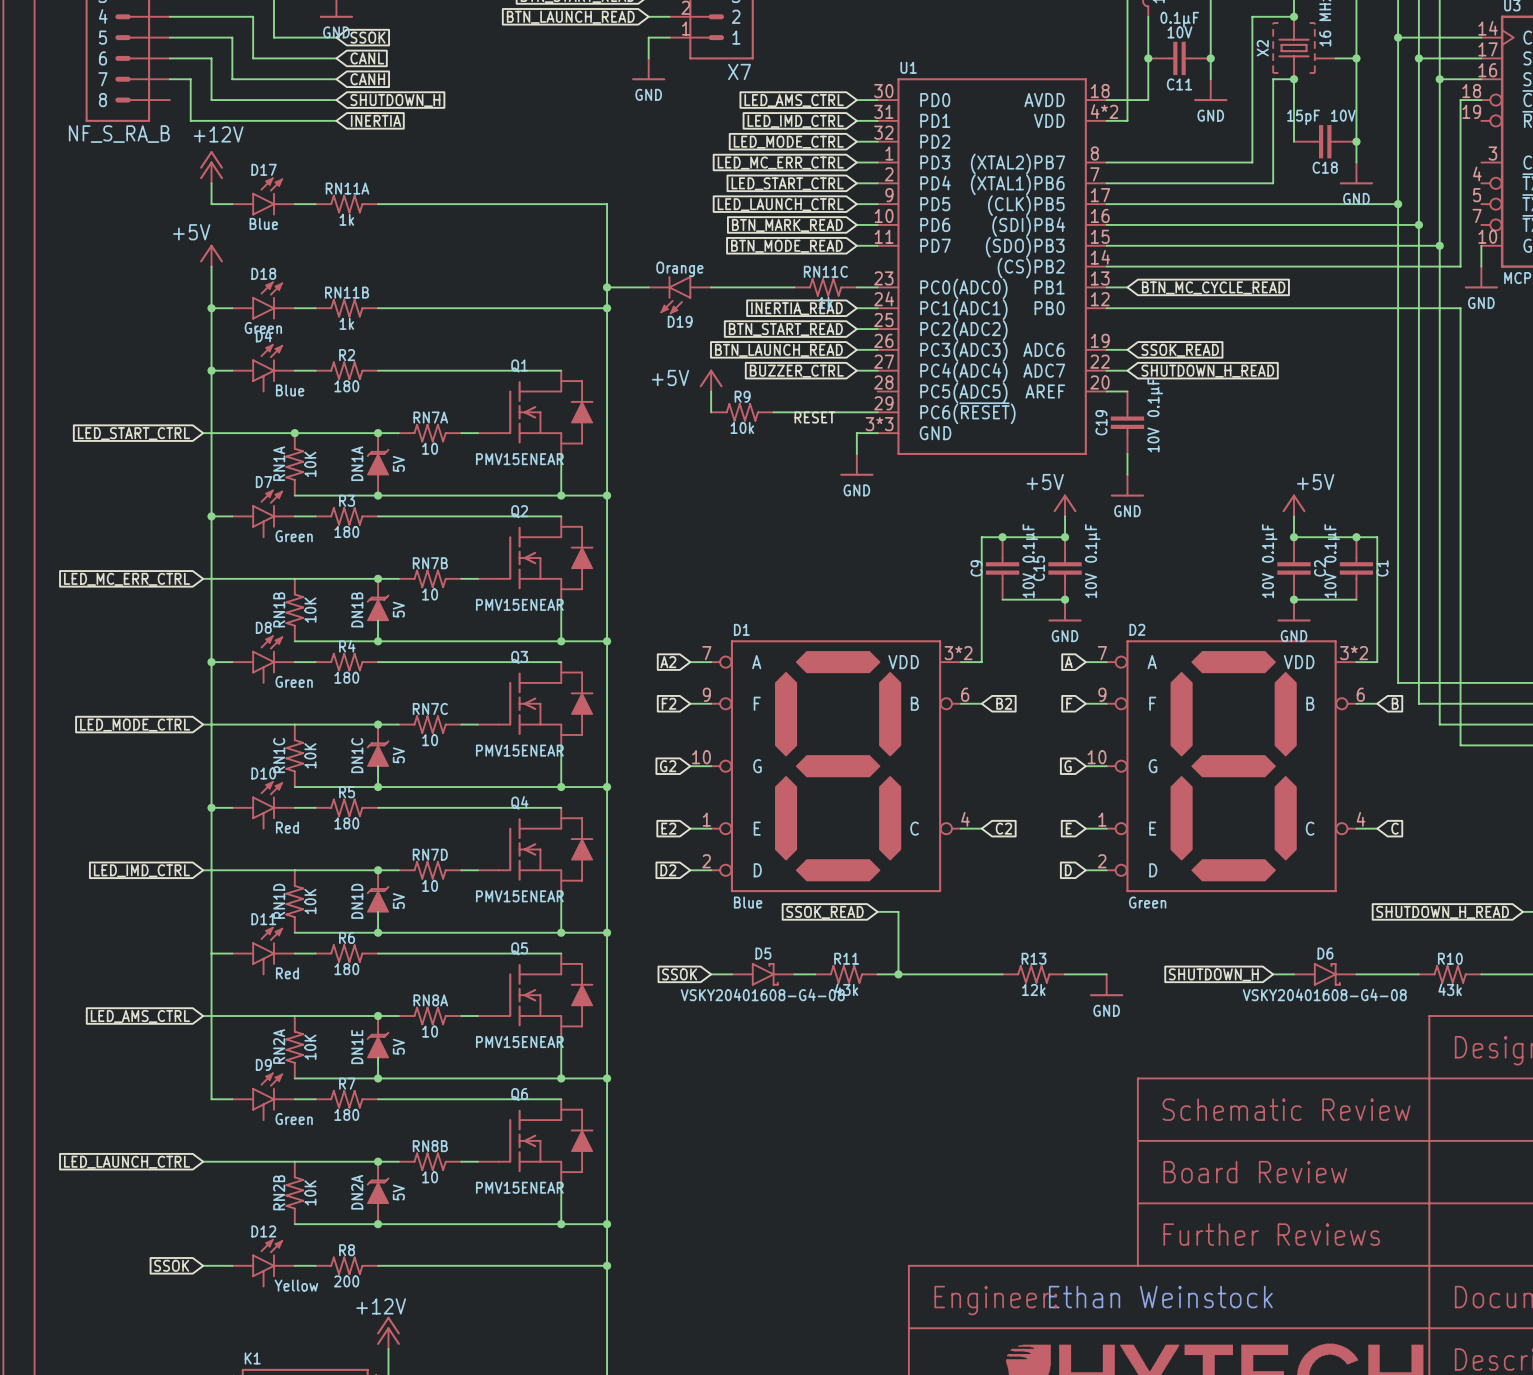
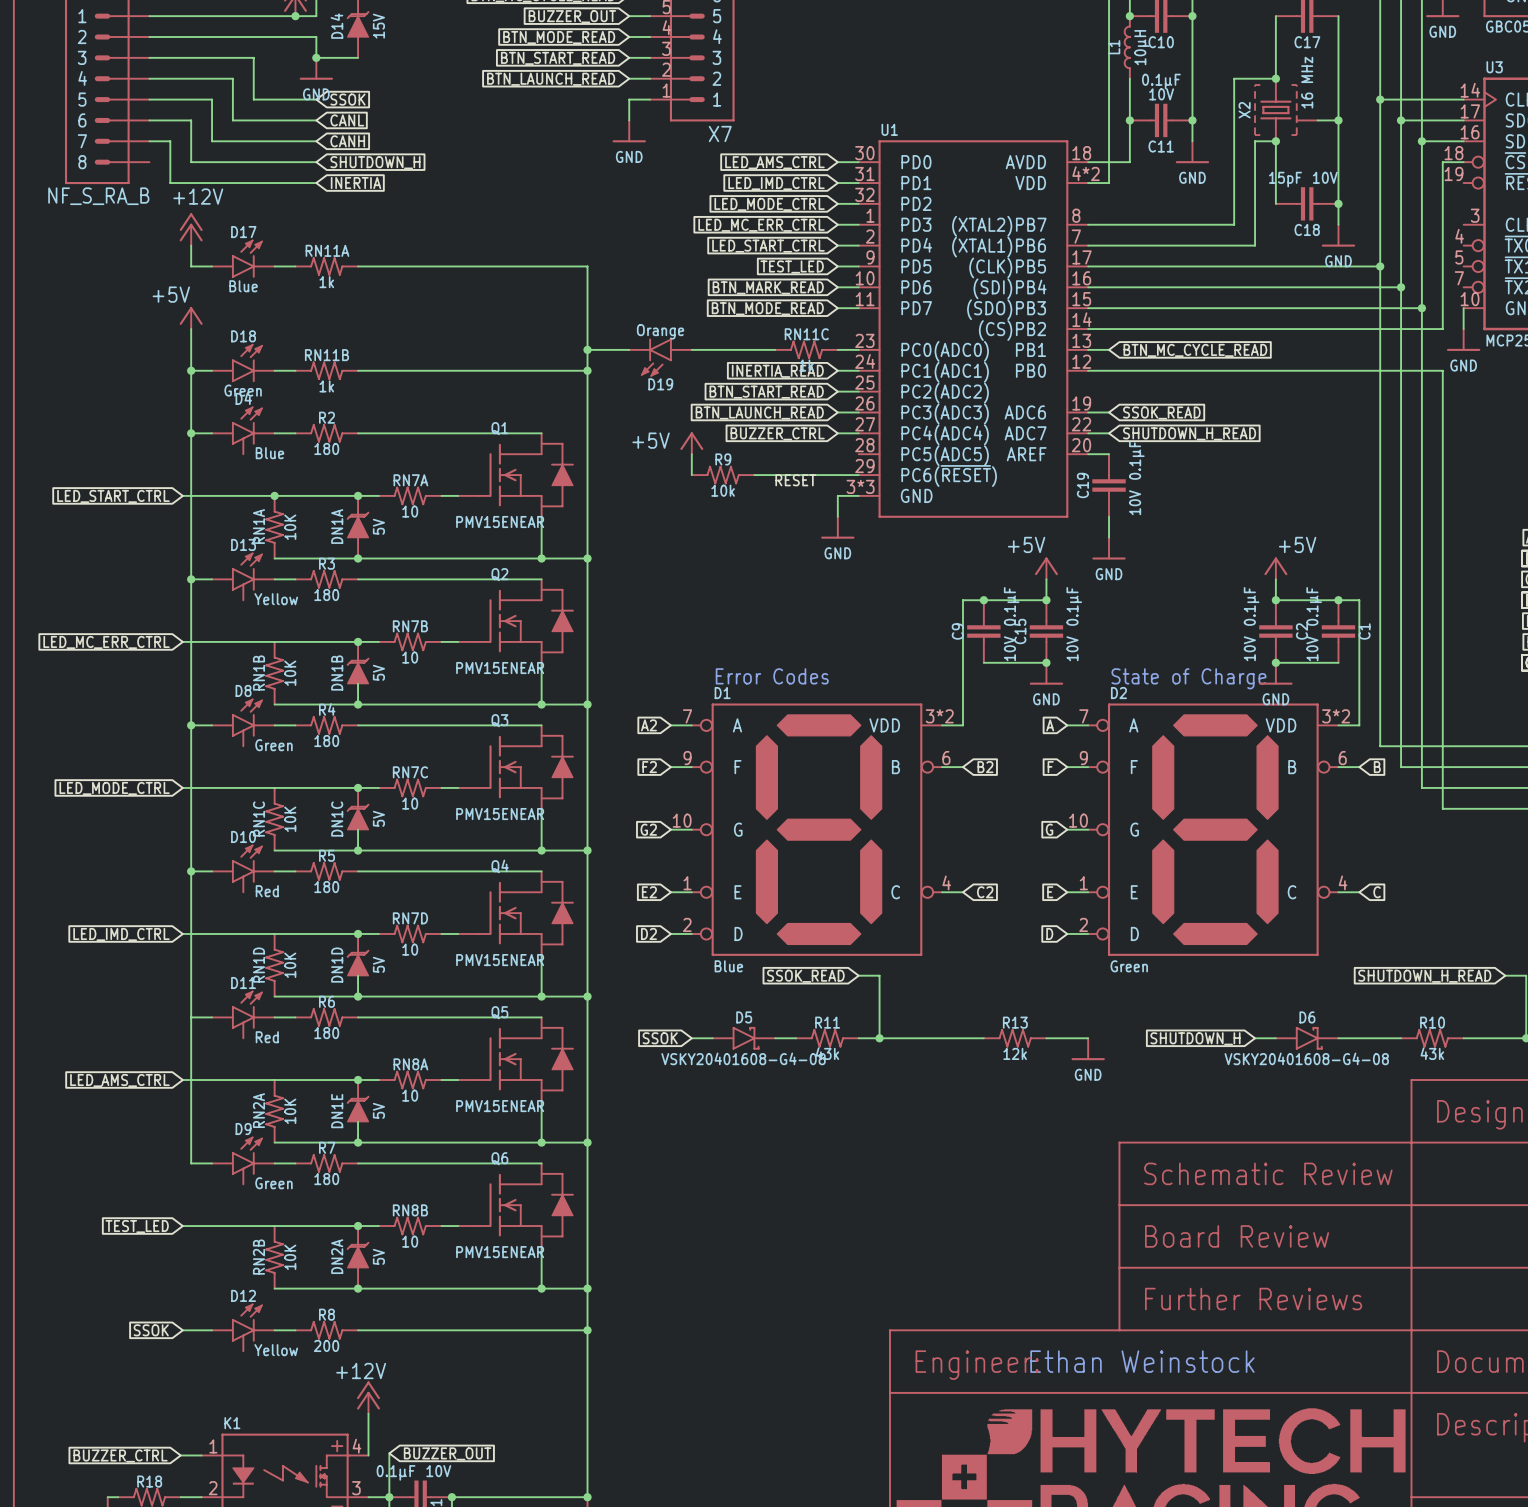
global label: LED_LAUNCH_CTRL (780, 204) -> TEST_LED (792, 266)
D7 name: D7 (264, 482) -> D13 (243, 544)
D7 text: Green (294, 536) -> Yellow (276, 599)
text: none -> Error Codes (772, 676)
text: none -> State of Charge (1188, 678)
global label: LED_LAUNCH_CTRL (127, 1162) -> TEST_LED (137, 1226)

